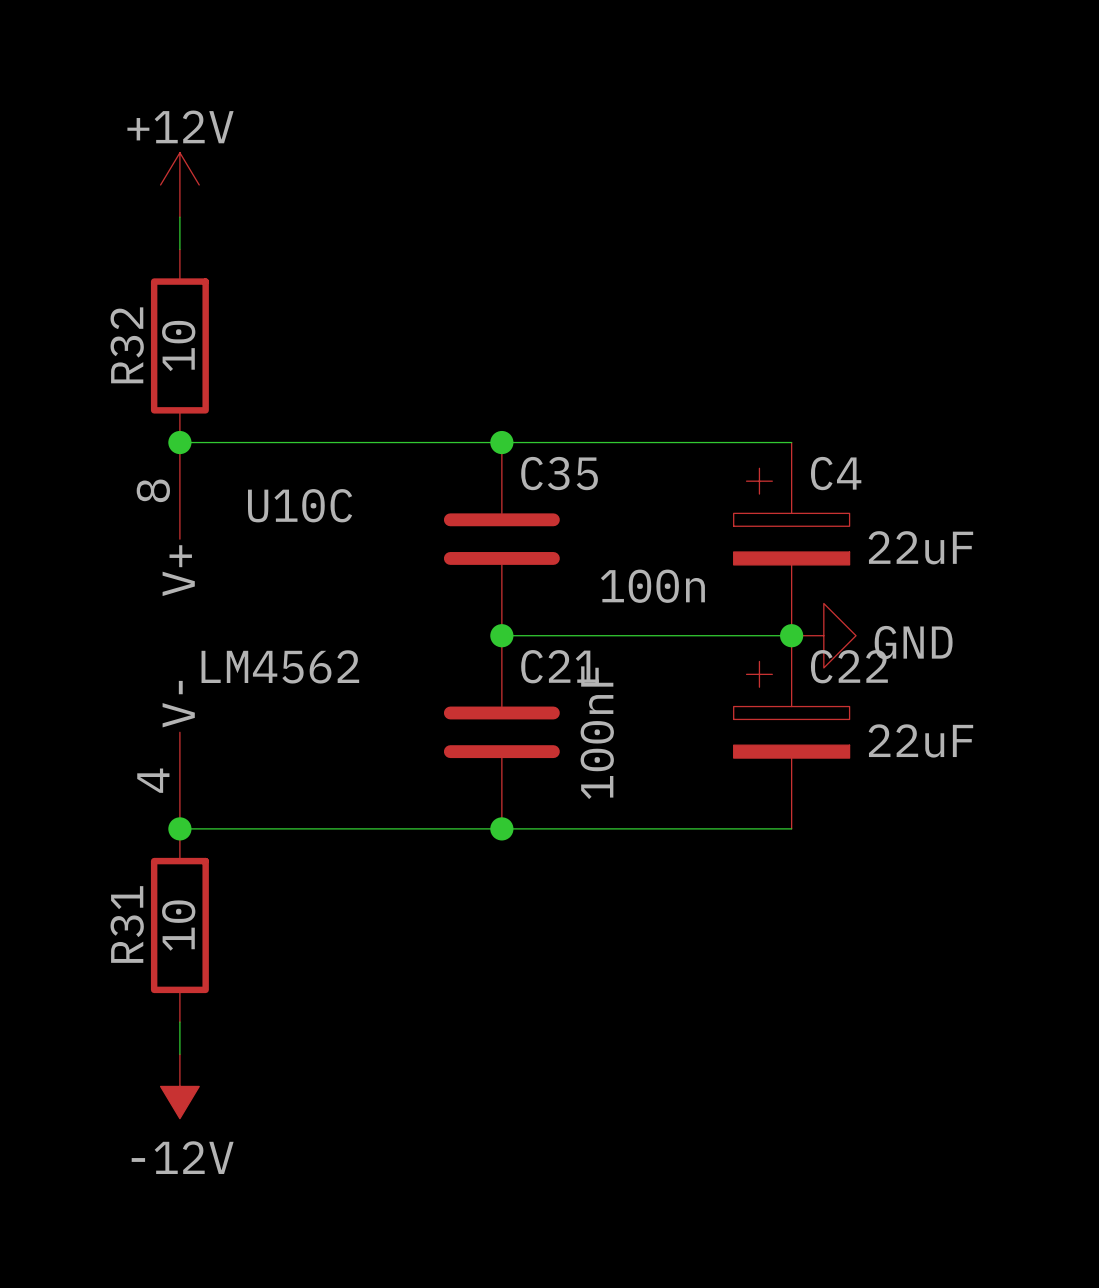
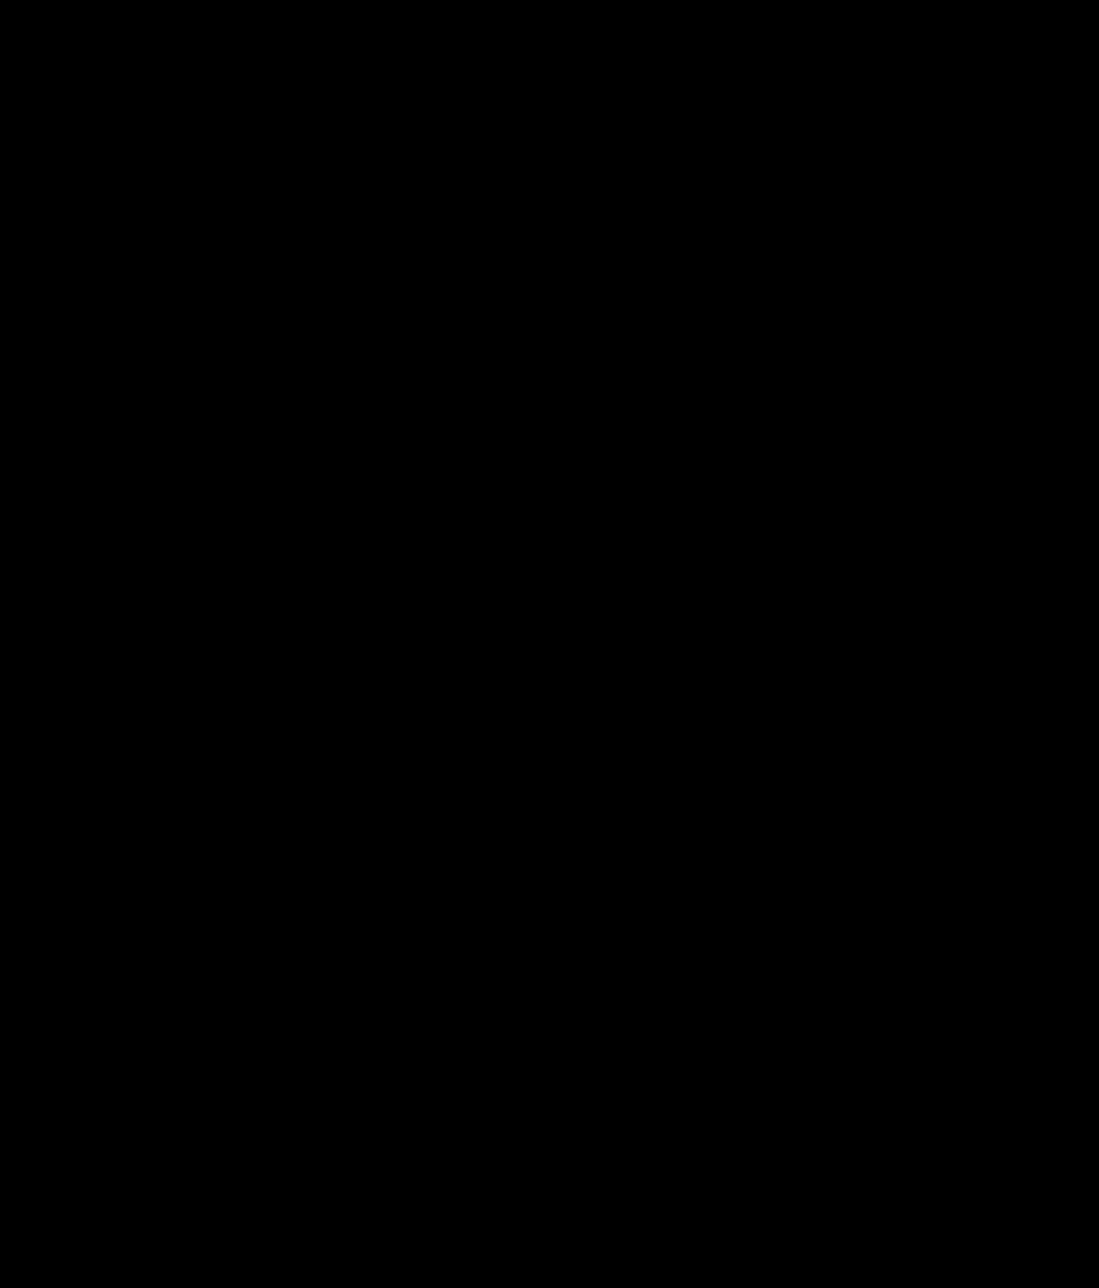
power symbol: +12V (179, 184) -> none
wire: (179, 217) (179, 249) -> none
R32: 10 (179, 345) -> none
wire: (179, 442) (791, 442) -> none
junction: (179, 442) -> none
junction: (501, 442) -> none
C35: 100n (501, 539) -> none
C4: 22uF (791, 539) -> none
U10C: LM4562 (179, 635) -> none
wire: (501, 635) (791, 635) -> none
junction: (501, 635) -> none
junction: (791, 635) -> none
power symbol: GND (823, 635) -> none
C21: 100nF (501, 732) -> none
C22: 22uF (791, 732) -> none
wire: (179, 828) (791, 828) -> none
junction: (179, 828) -> none
junction: (501, 828) -> none
R31: 10 (179, 925) -> none
wire: (179, 1022) (179, 1054) -> none
power symbol: -12V (179, 1086) -> none

